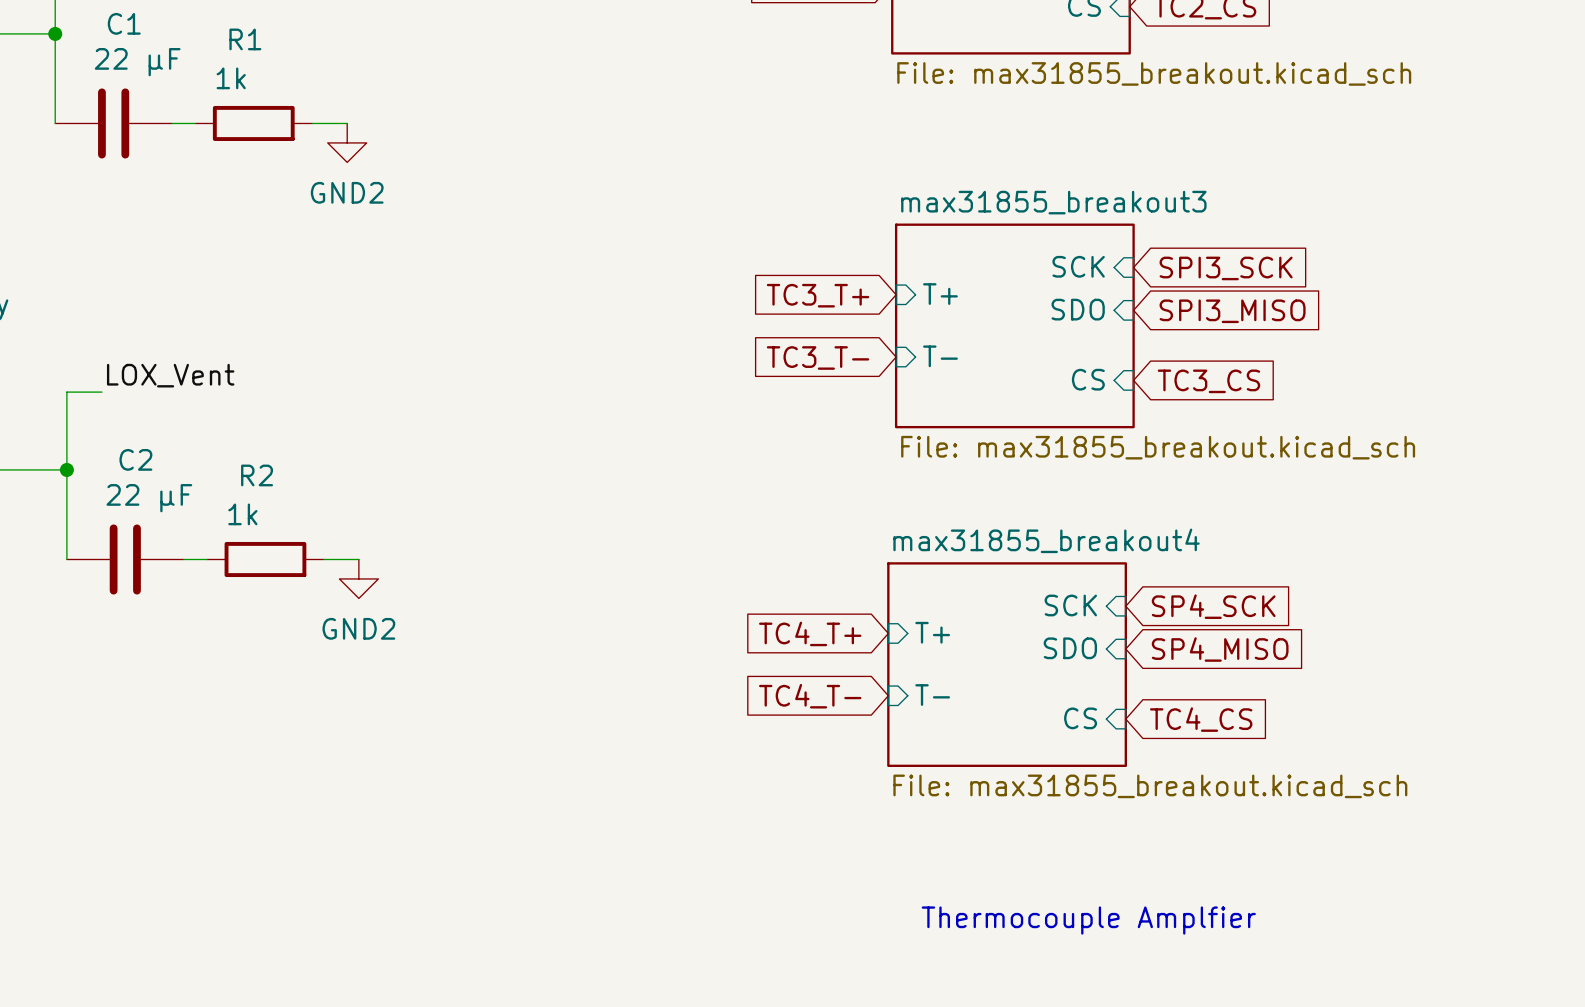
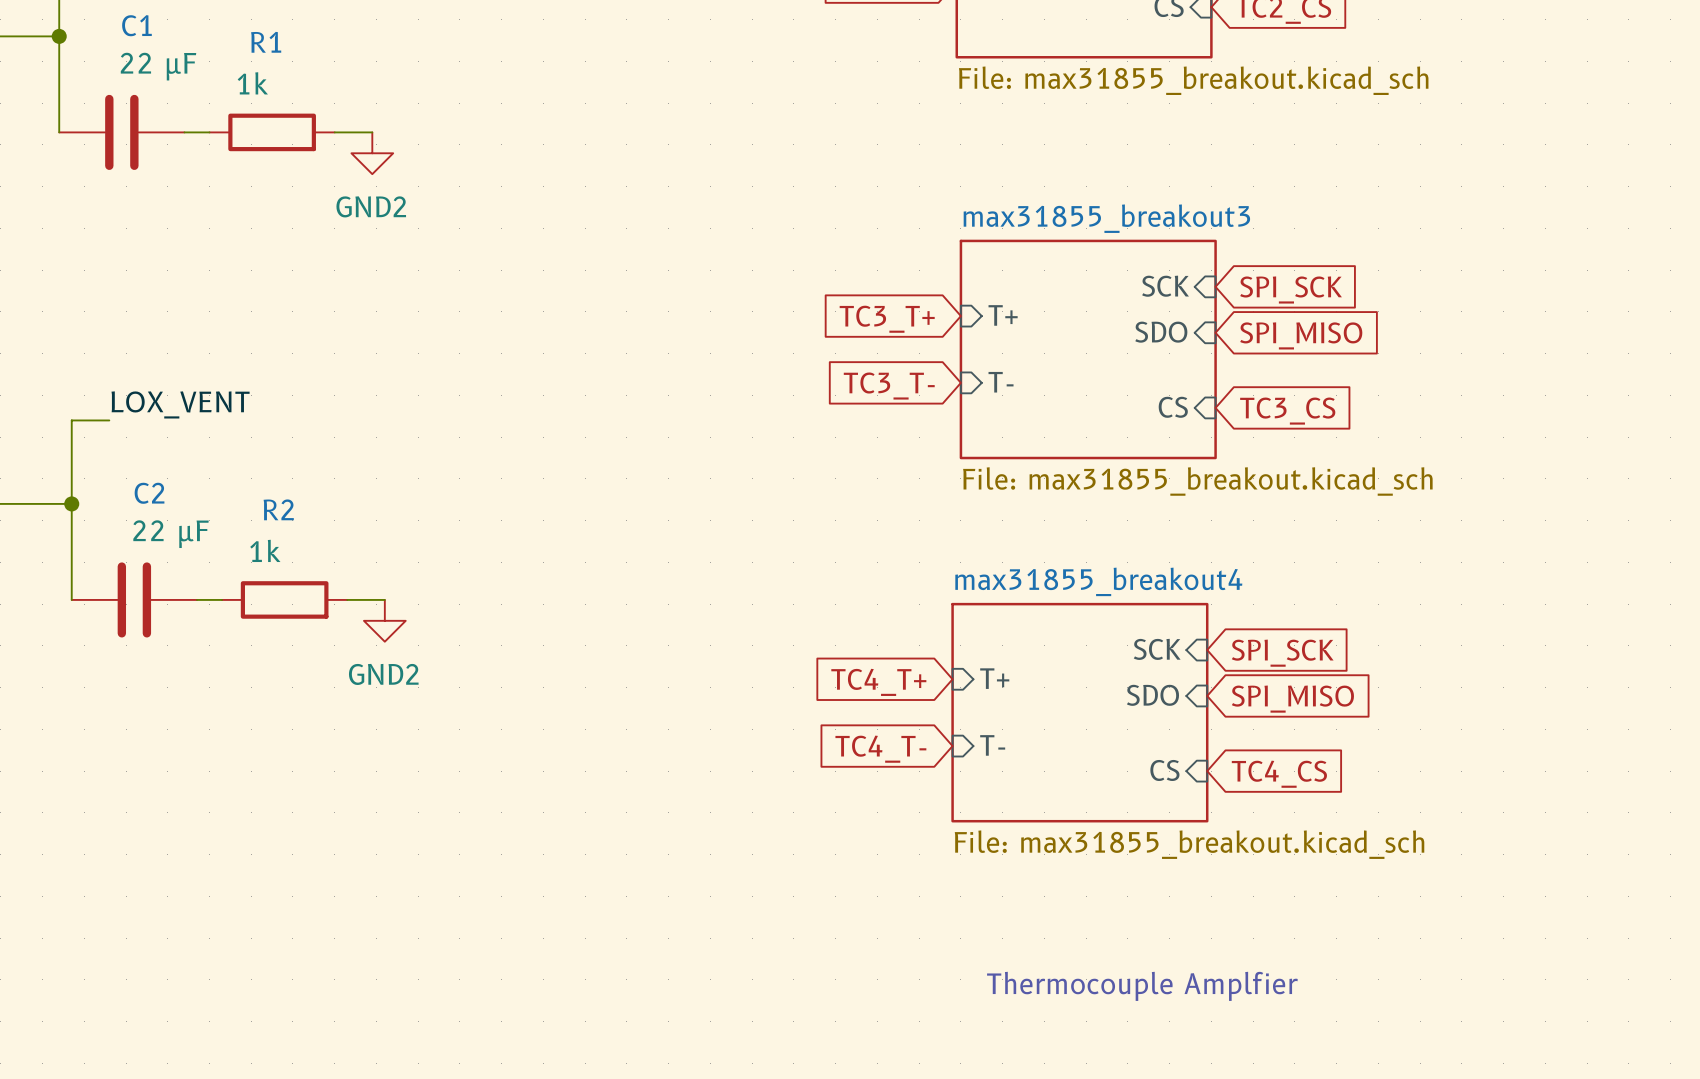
global label: SPI3_SCK (1226, 268) -> SPI_SCK (1291, 289)
global label: SPI3_MISO (1232, 311) -> SPI_MISO (1301, 335)
label: LOX_Vent (170, 375) -> LOX_VENT (180, 404)
global label: SP4_SCK (1213, 606) -> SPI_SCK (1282, 653)
global label: SP4_MISO (1220, 649) -> SPI_MISO (1292, 699)

